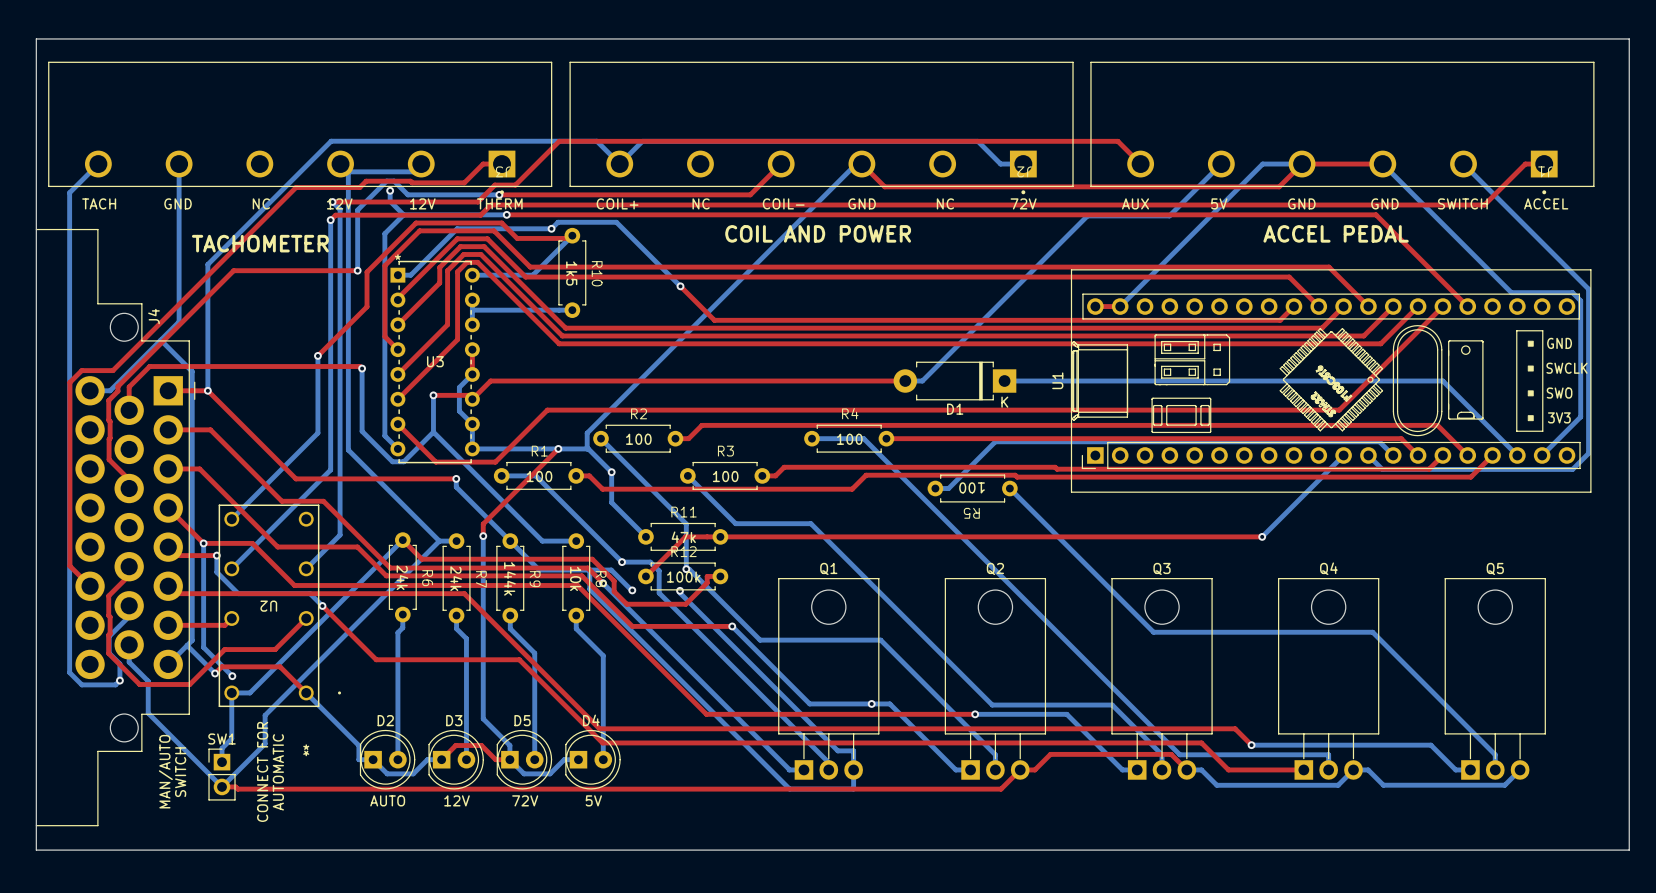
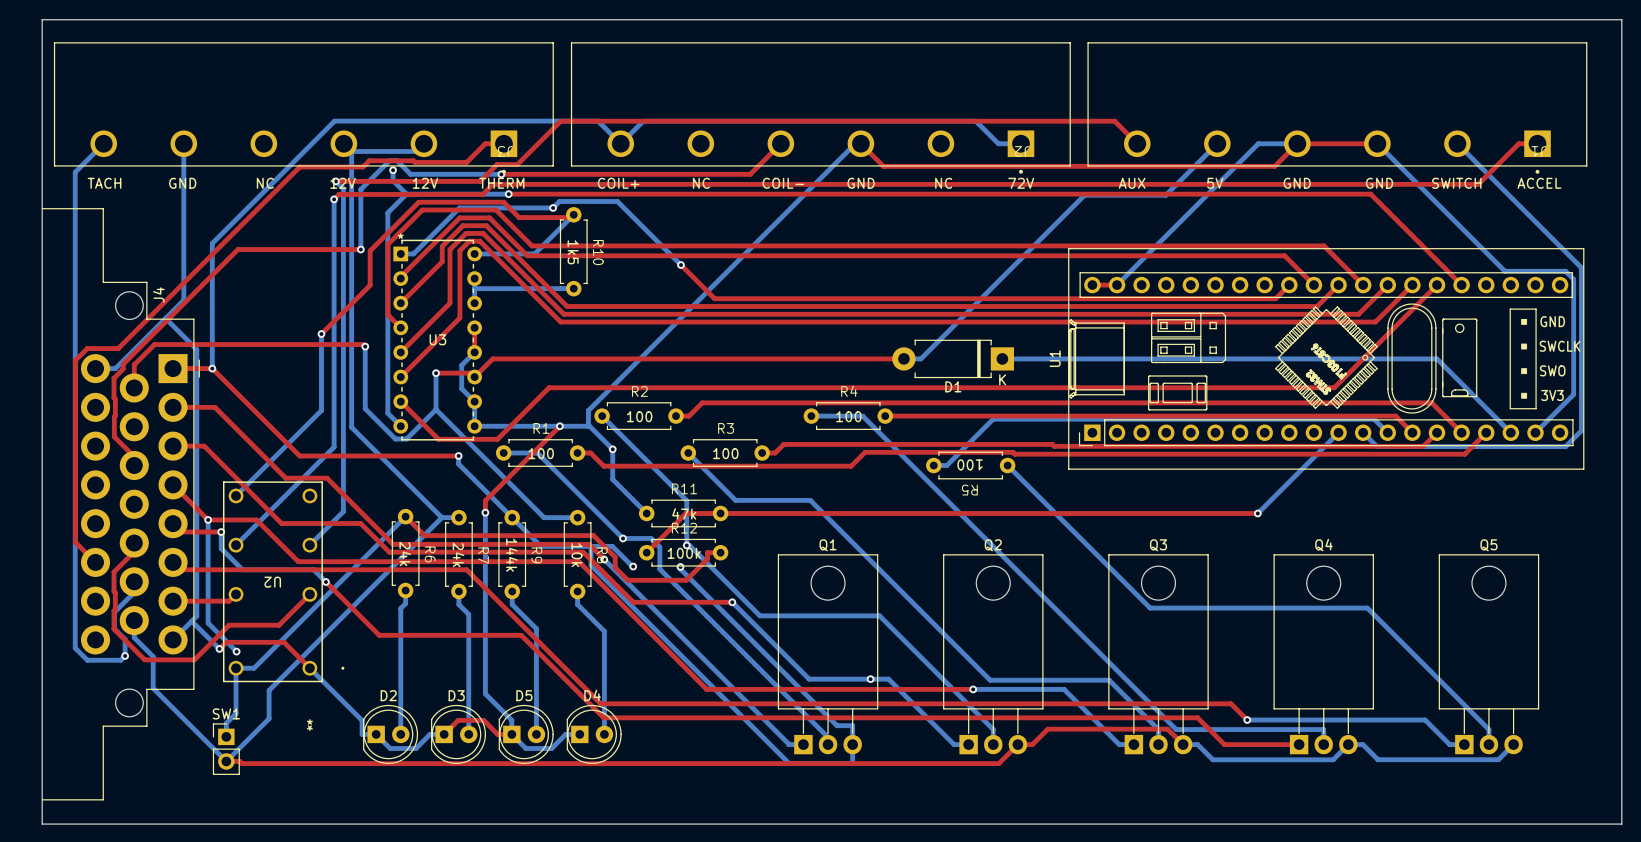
text: COIL AND POWER (818, 233) -> none
text: ACCEL PEDAL (1336, 233) -> none
text: TACHOMETER (260, 243) -> none
text: MAN/AUTO (165, 771) -> none
text: CONNECT FOR (262, 771) -> none
text: SWITCH (180, 772) -> none
text: AUTOMATIC (278, 772) -> none
text: AUTO (387, 800) -> none
text: 12V (457, 800) -> none
text: 72V (525, 800) -> none
text: 5V (593, 800) -> none

